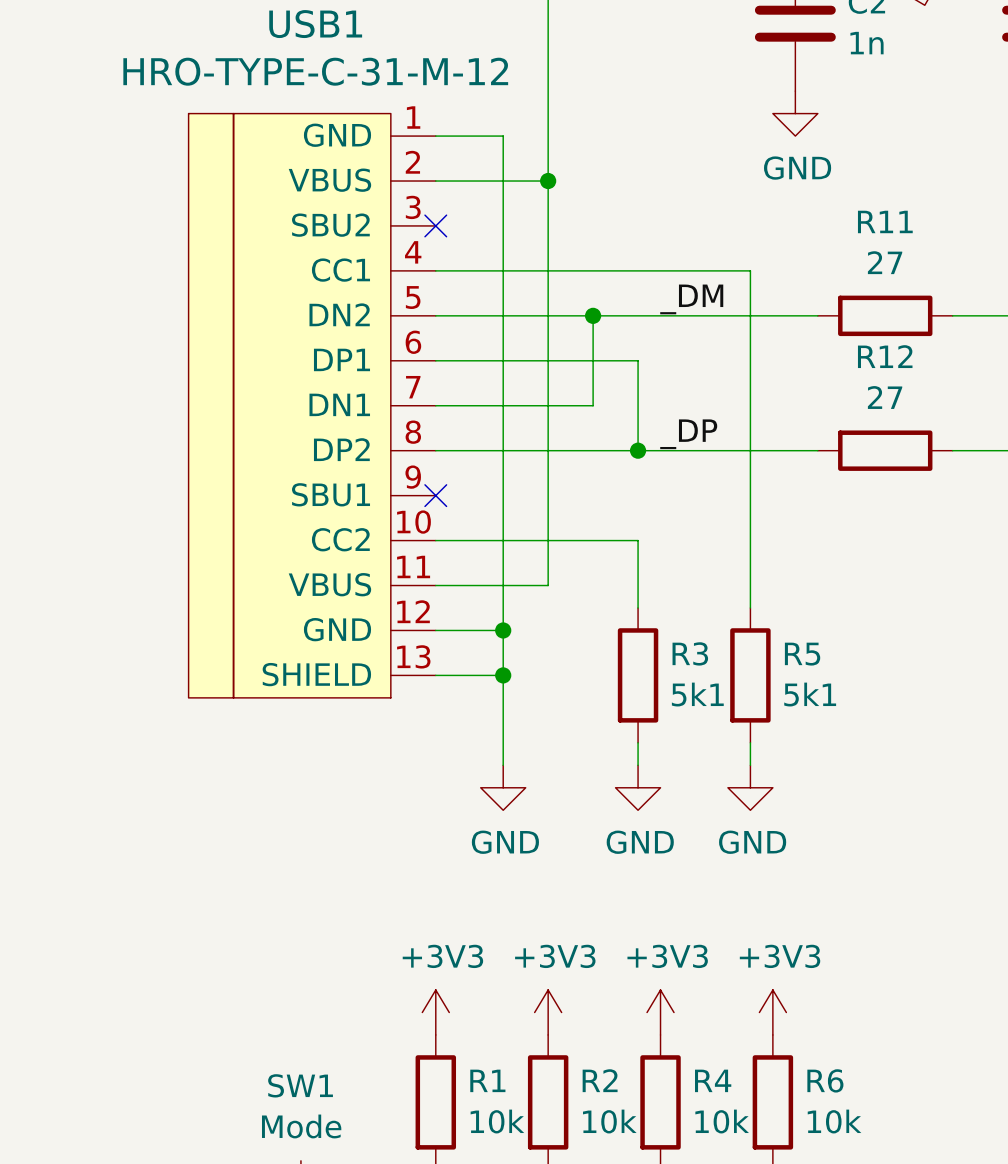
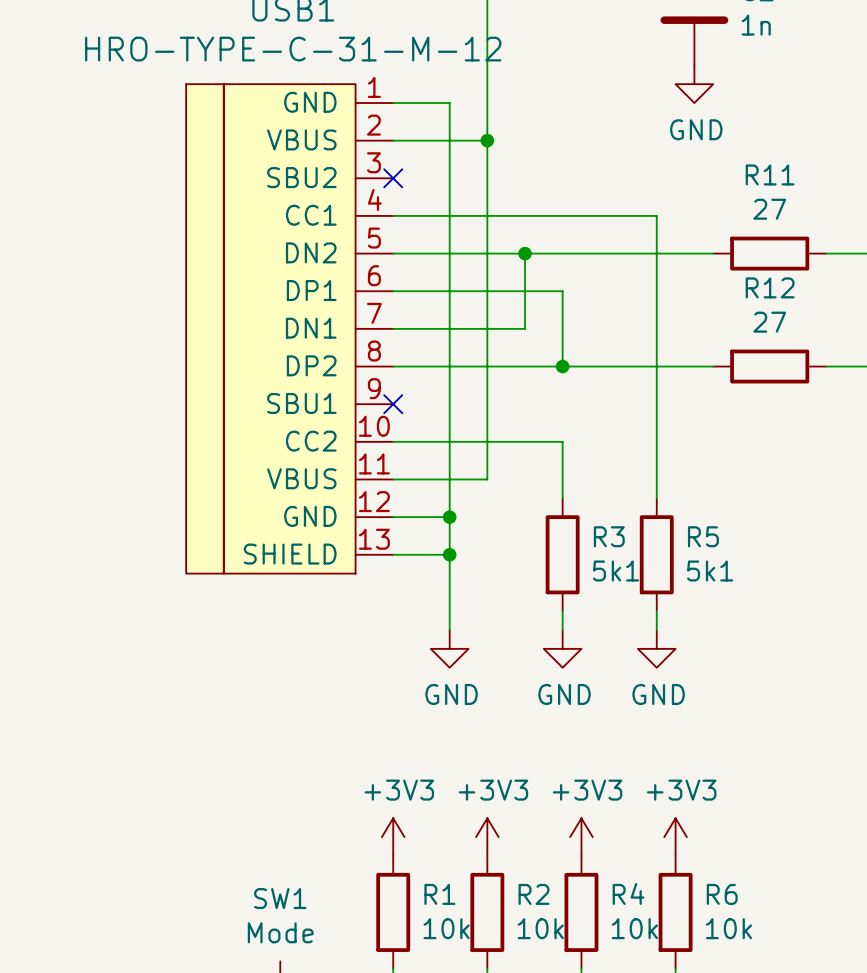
label: _DM (691, 299) -> none
label: _DP (688, 434) -> none

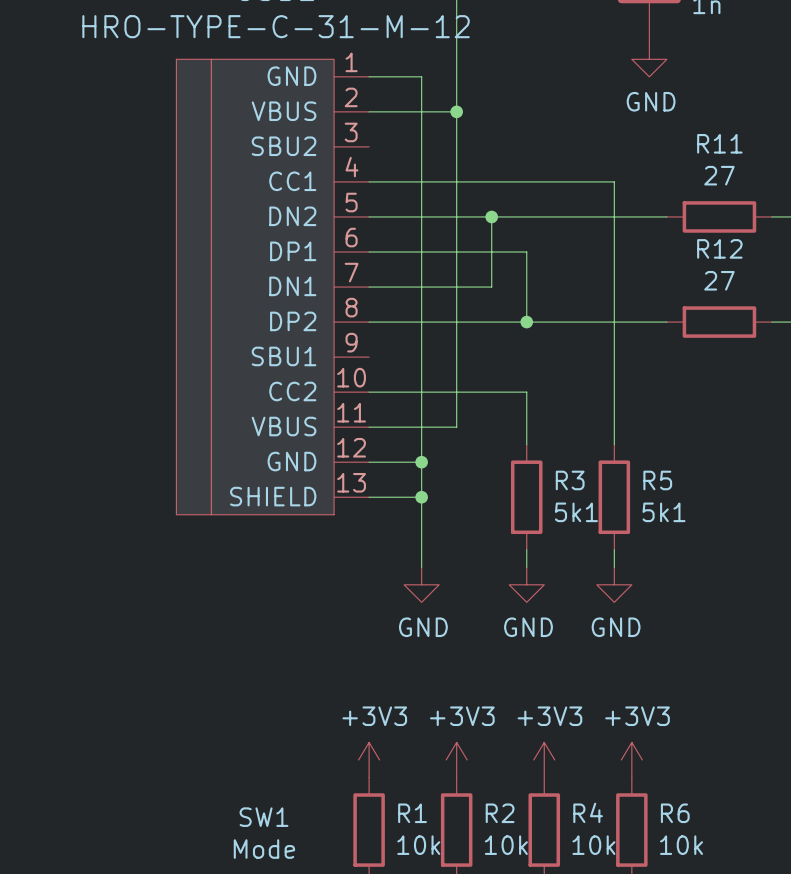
no-connect mark: (393, 178) -> none
no-connect mark: (393, 404) -> none

